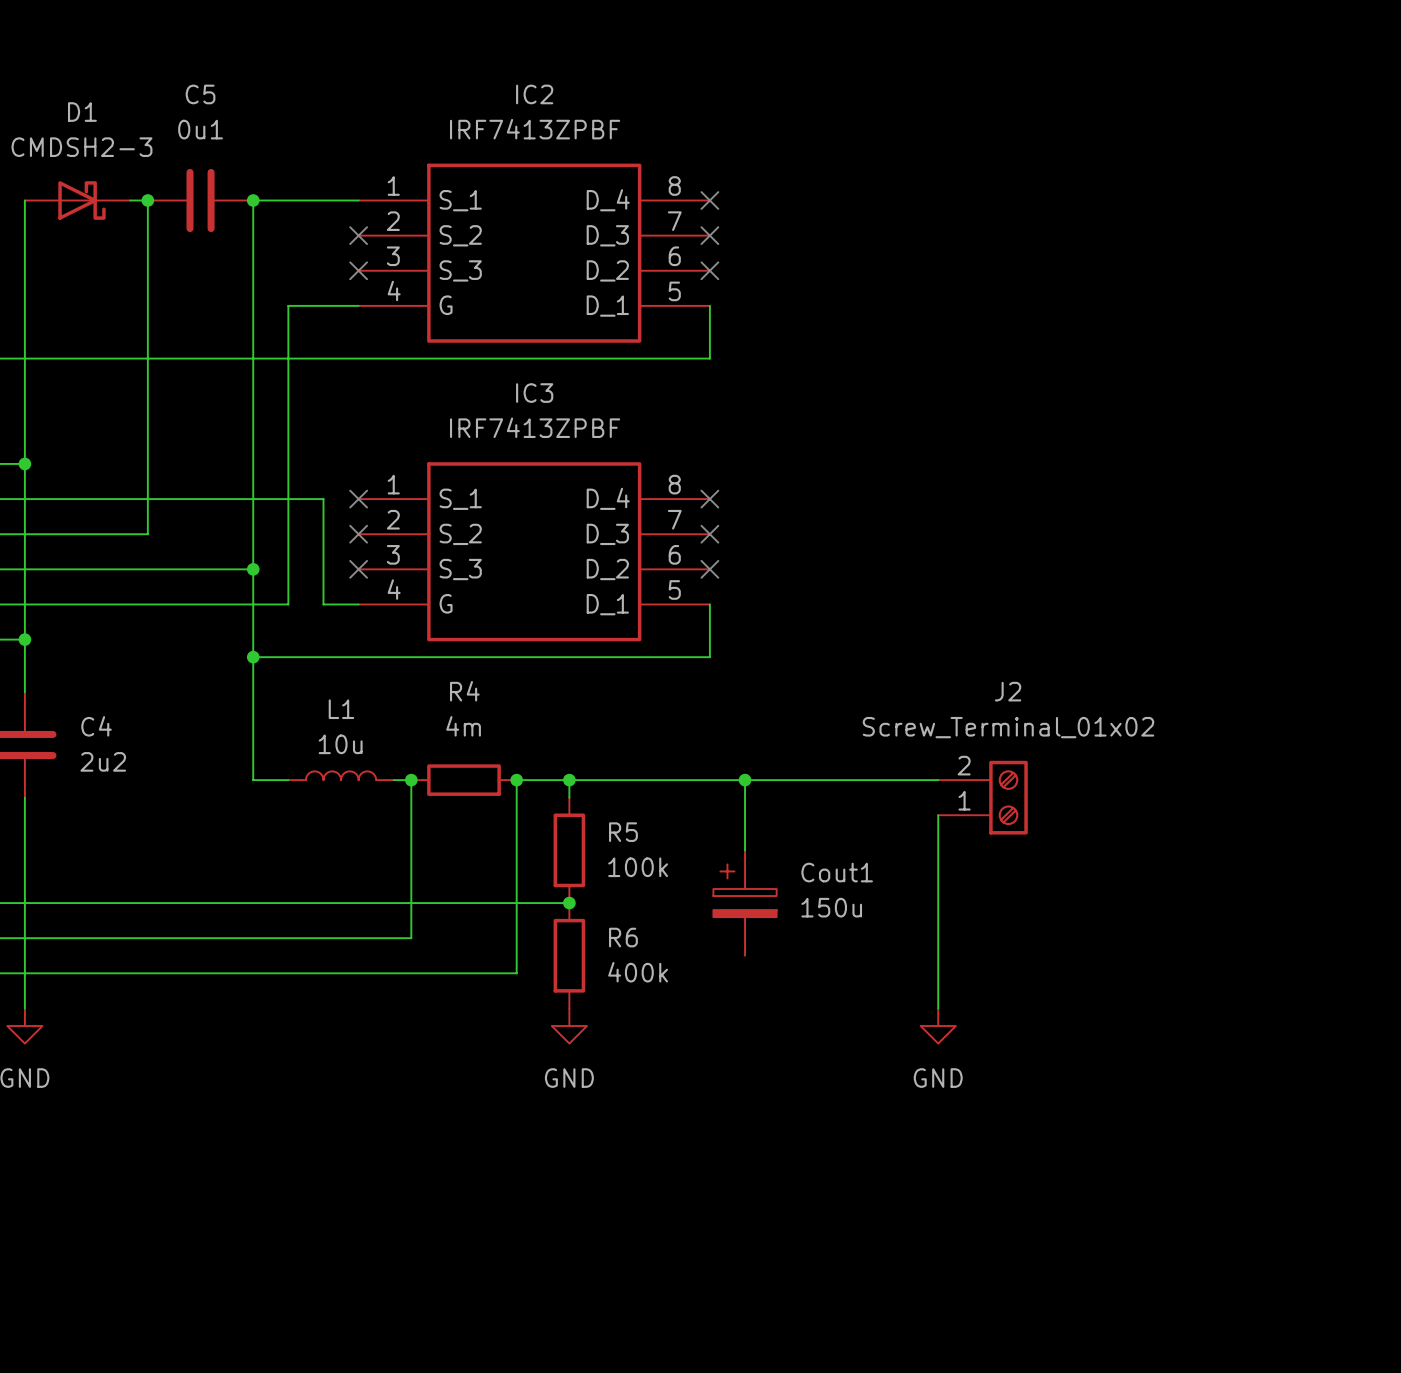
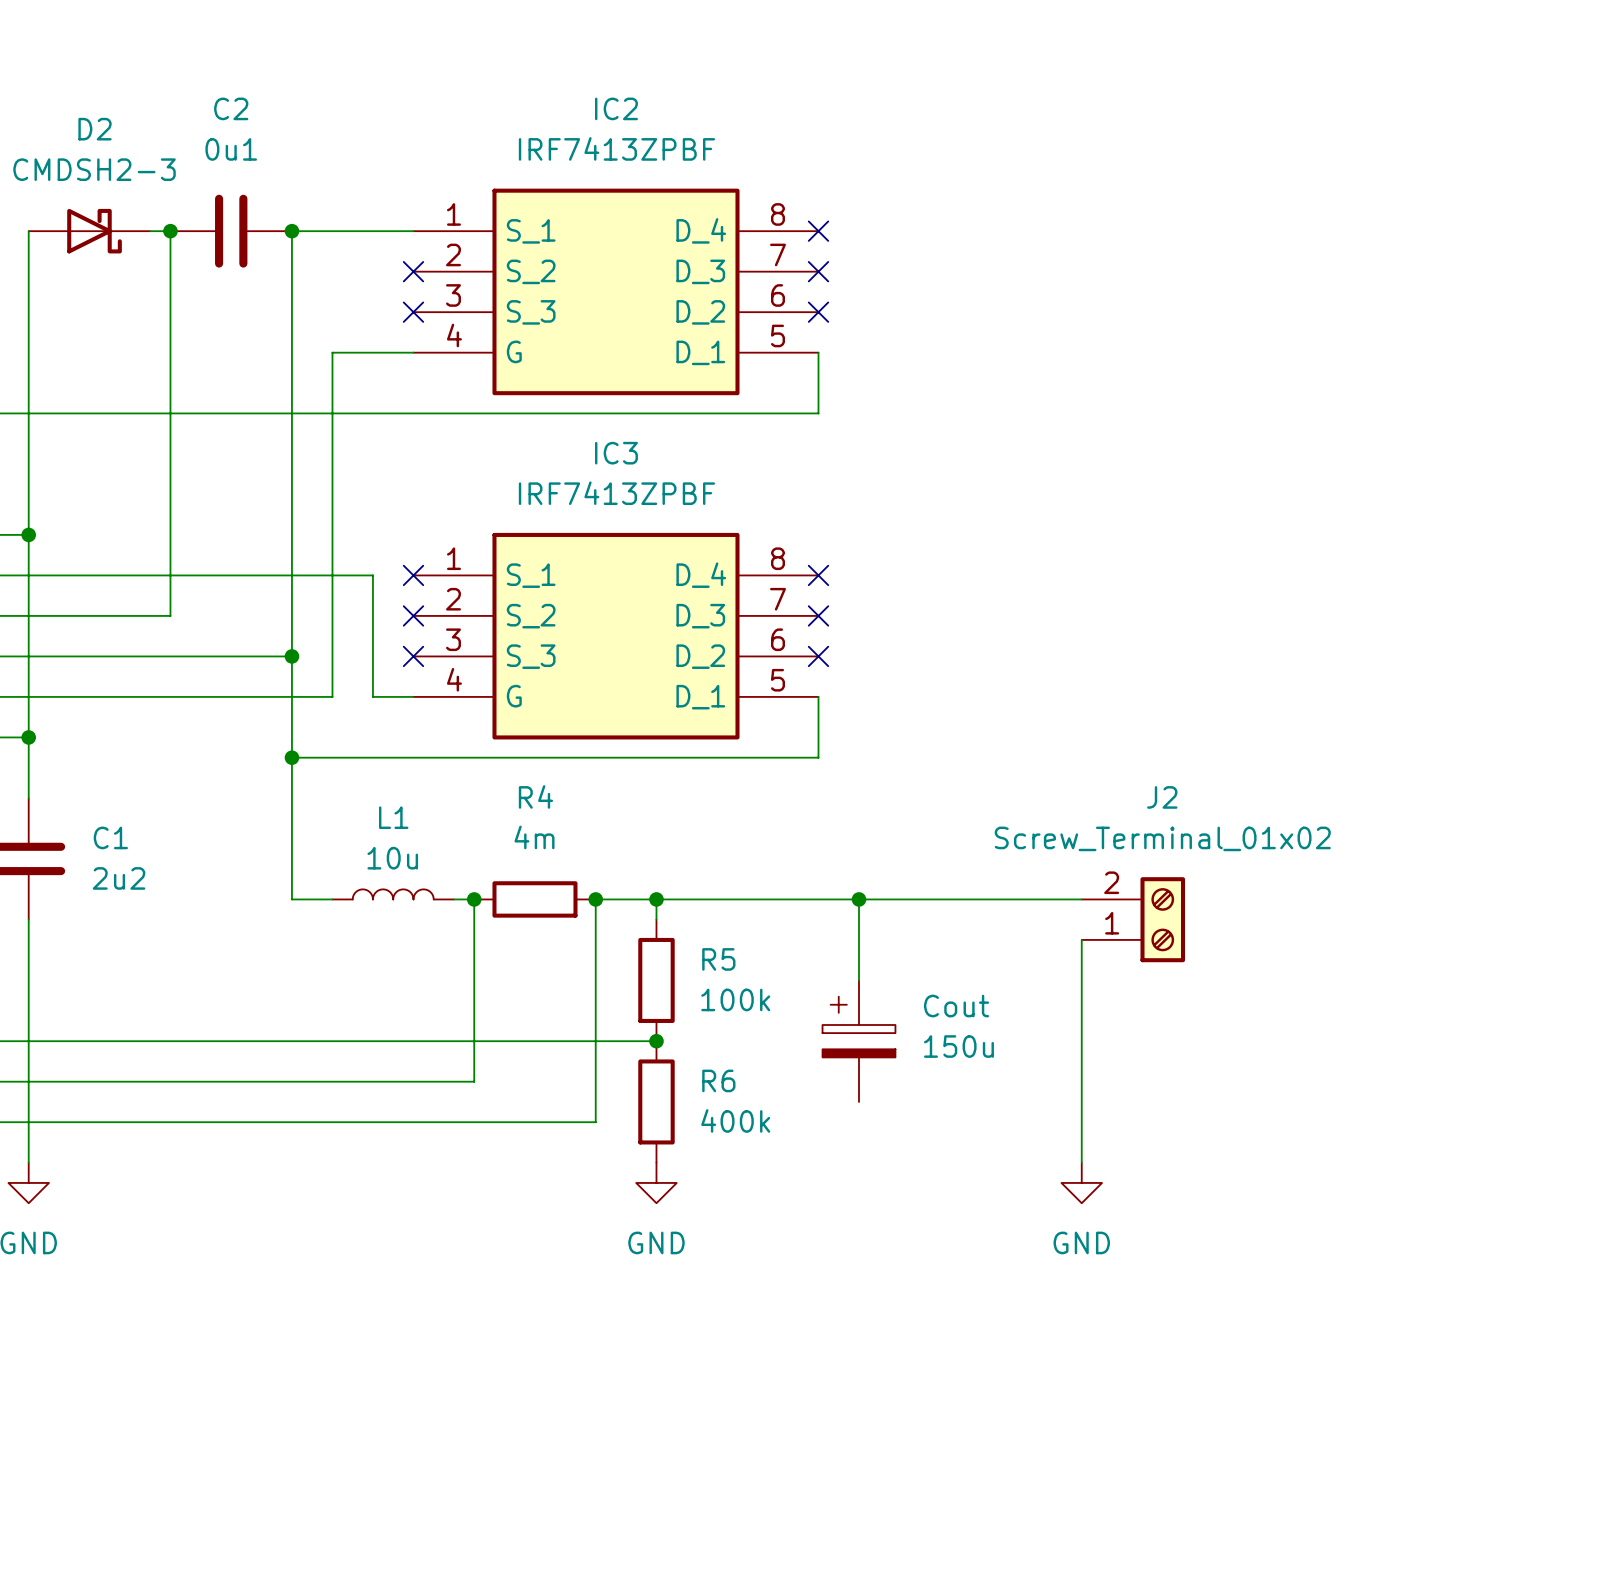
C5 name: C5 (200, 94) -> C2 (231, 108)
D1 name: D1 (82, 112) -> D2 (95, 129)
C4 name: C4 (96, 726) -> C1 (110, 837)
Cout1 name: Cout1 (837, 872) -> Cout (956, 1006)

